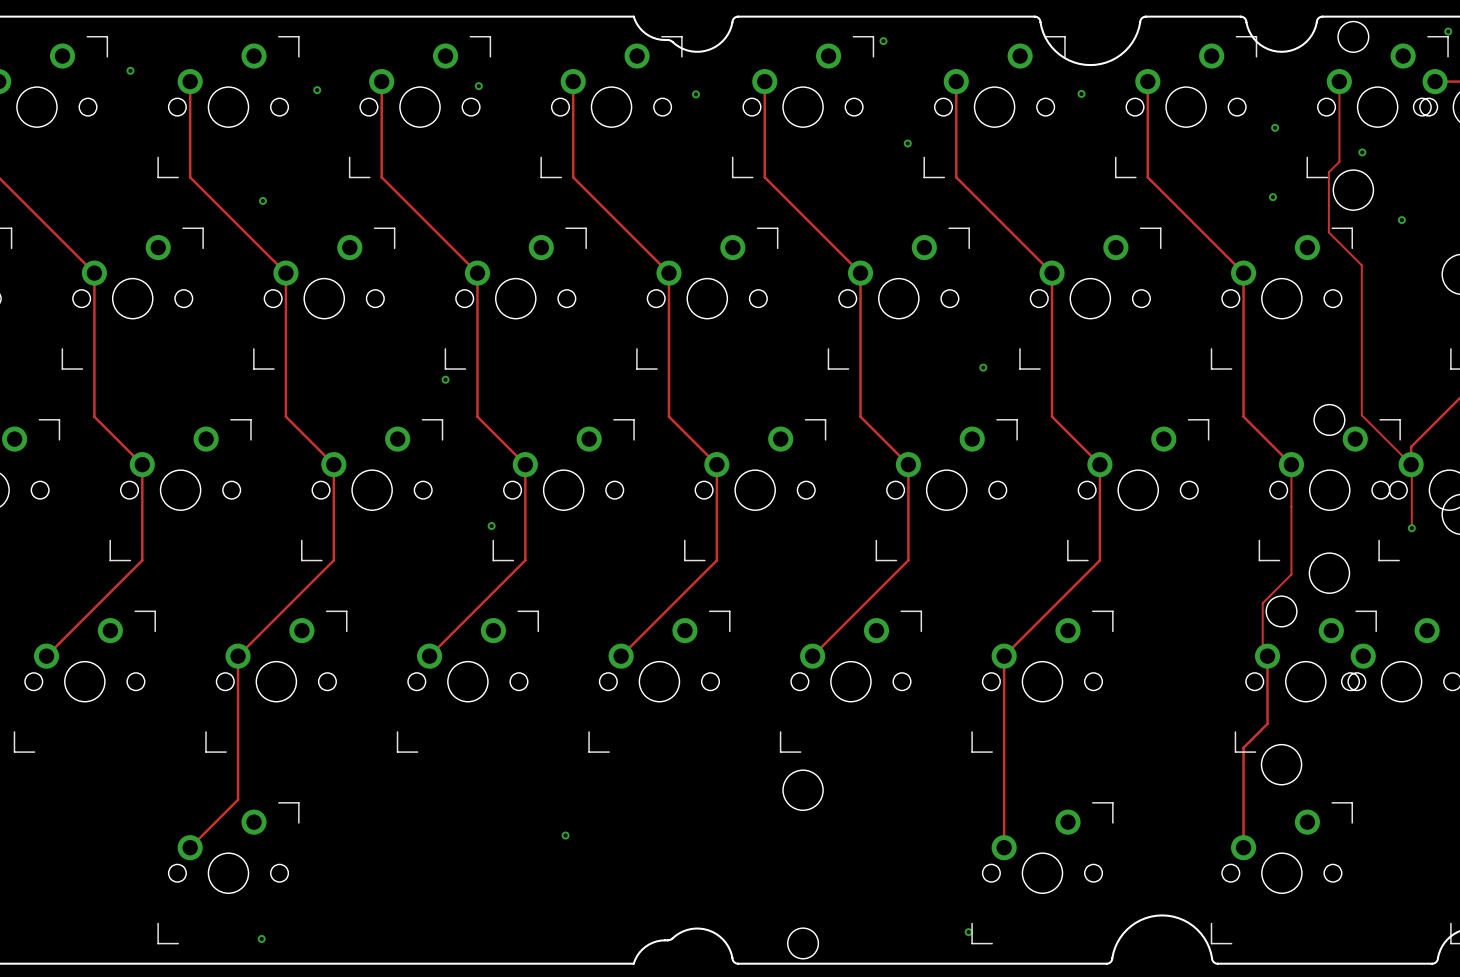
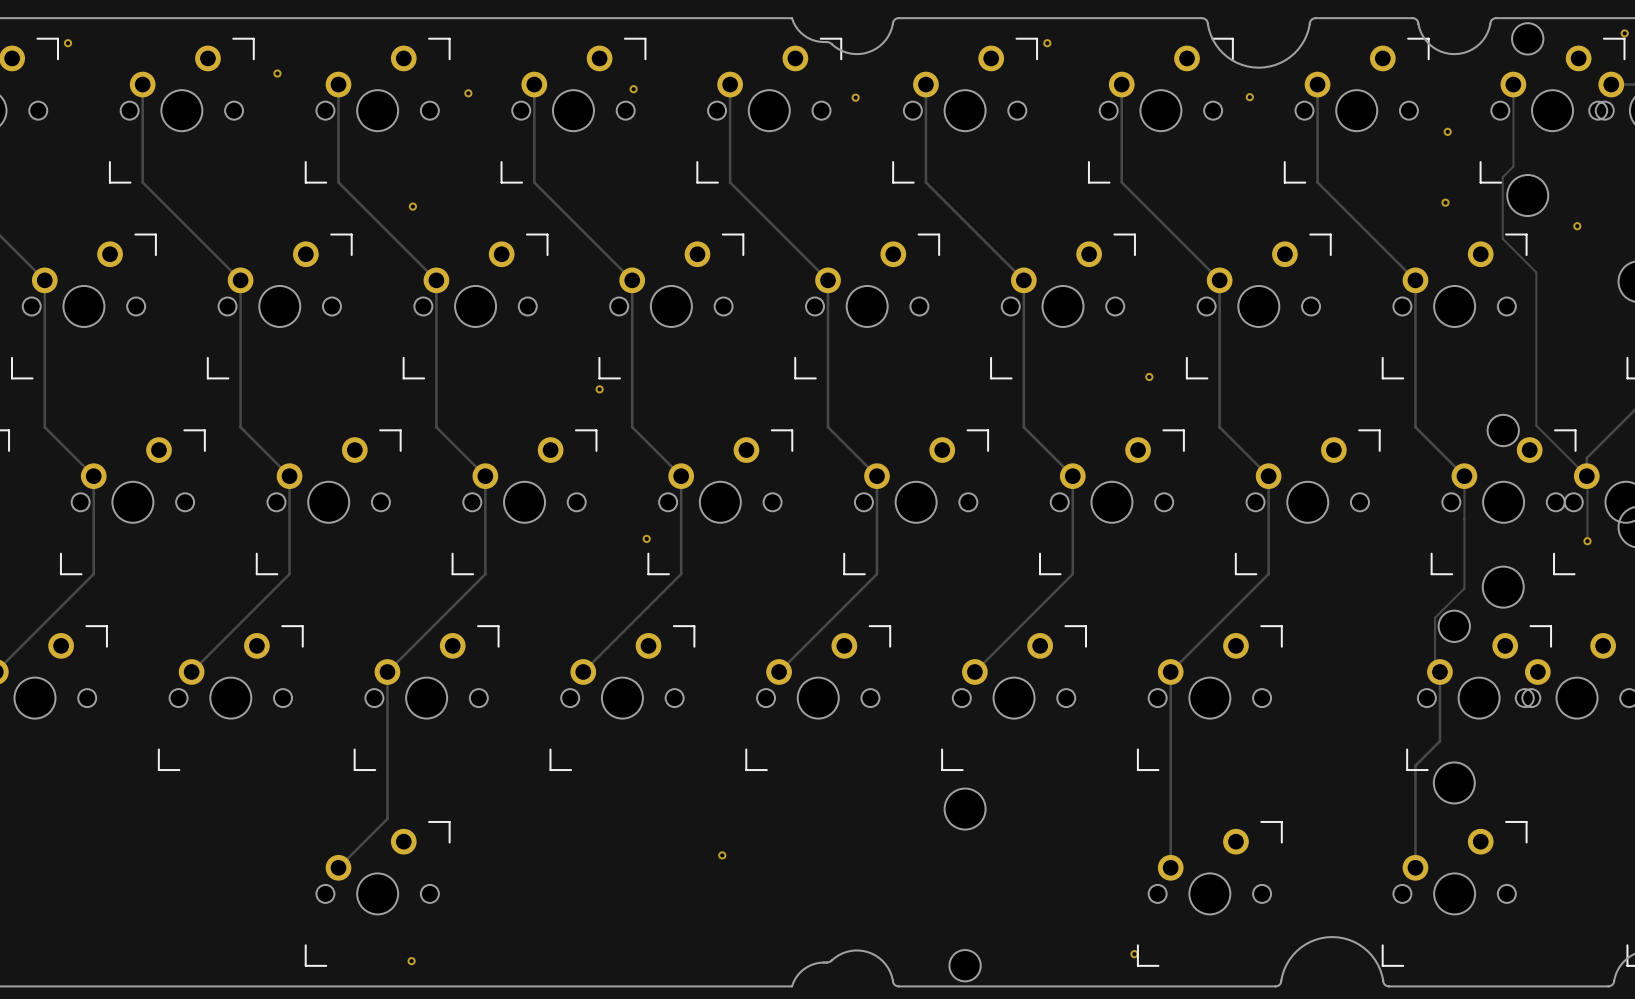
via: (907, 143) -> none
via: (1362, 152) -> none

